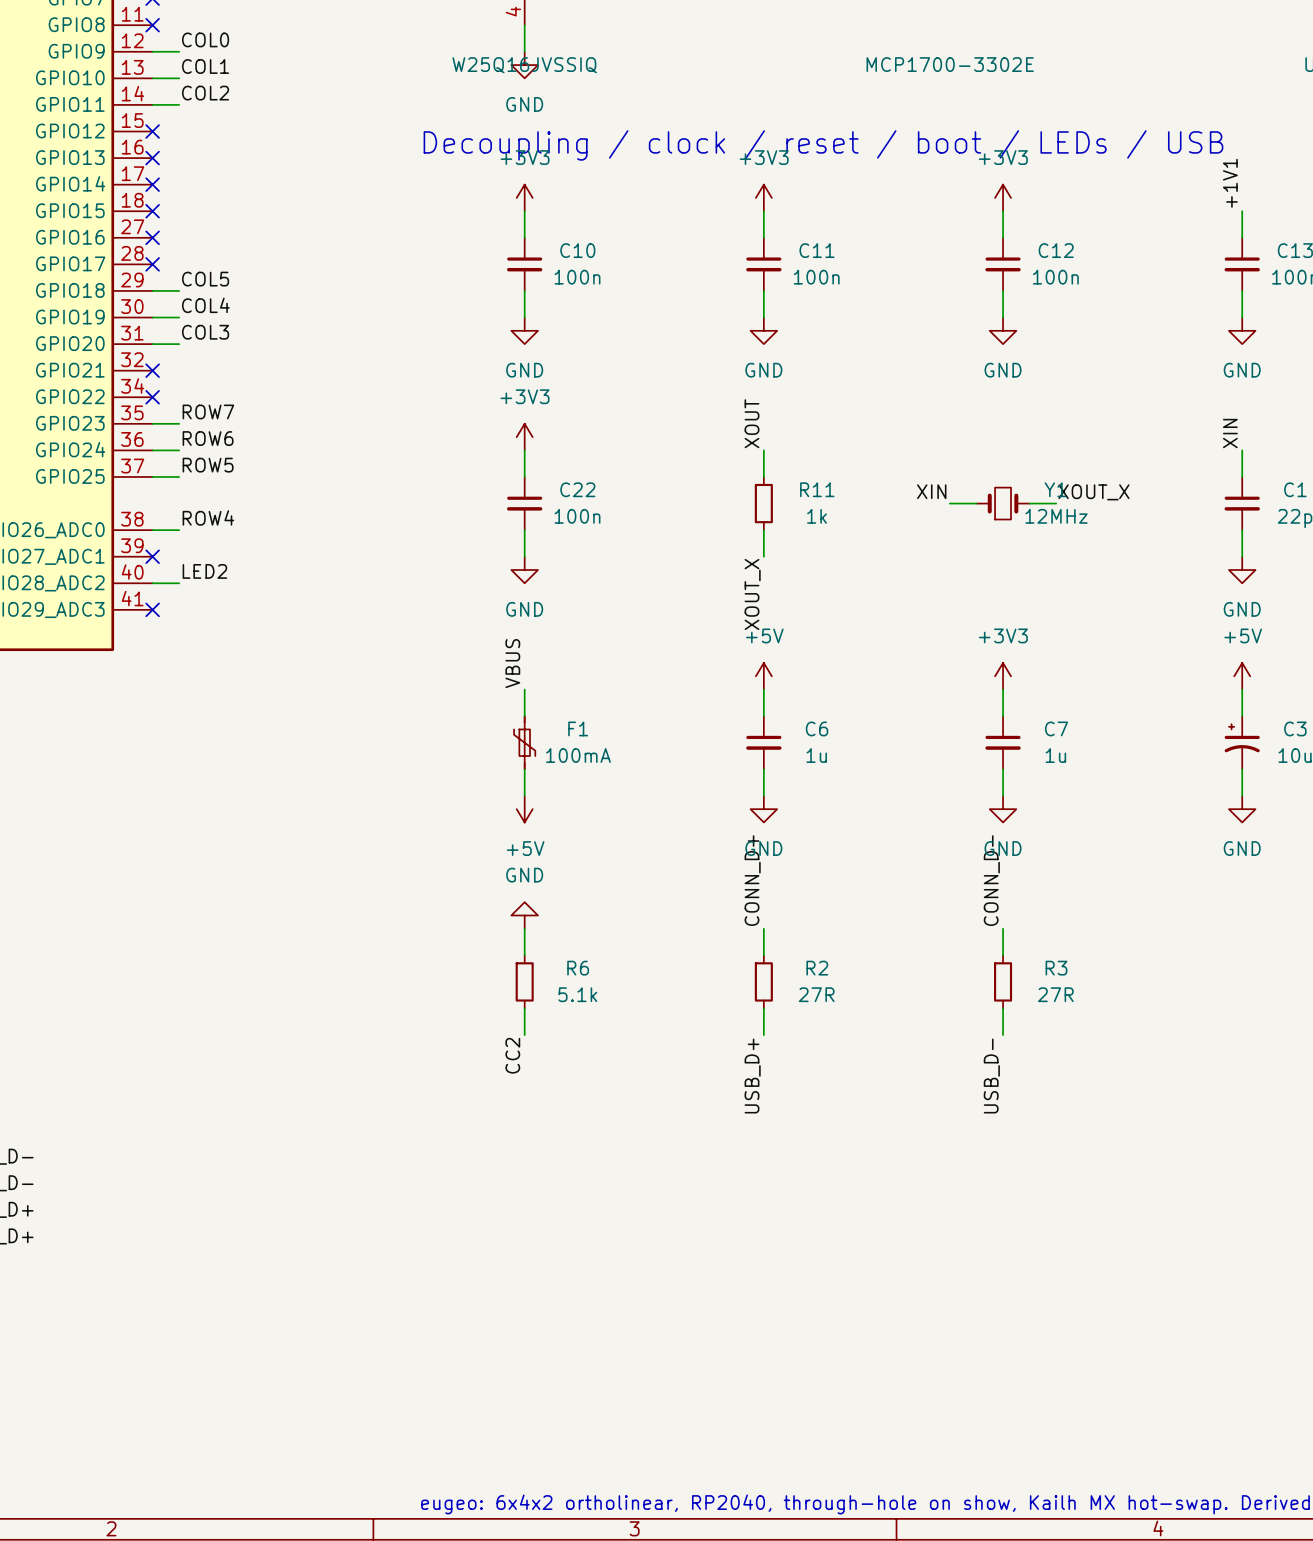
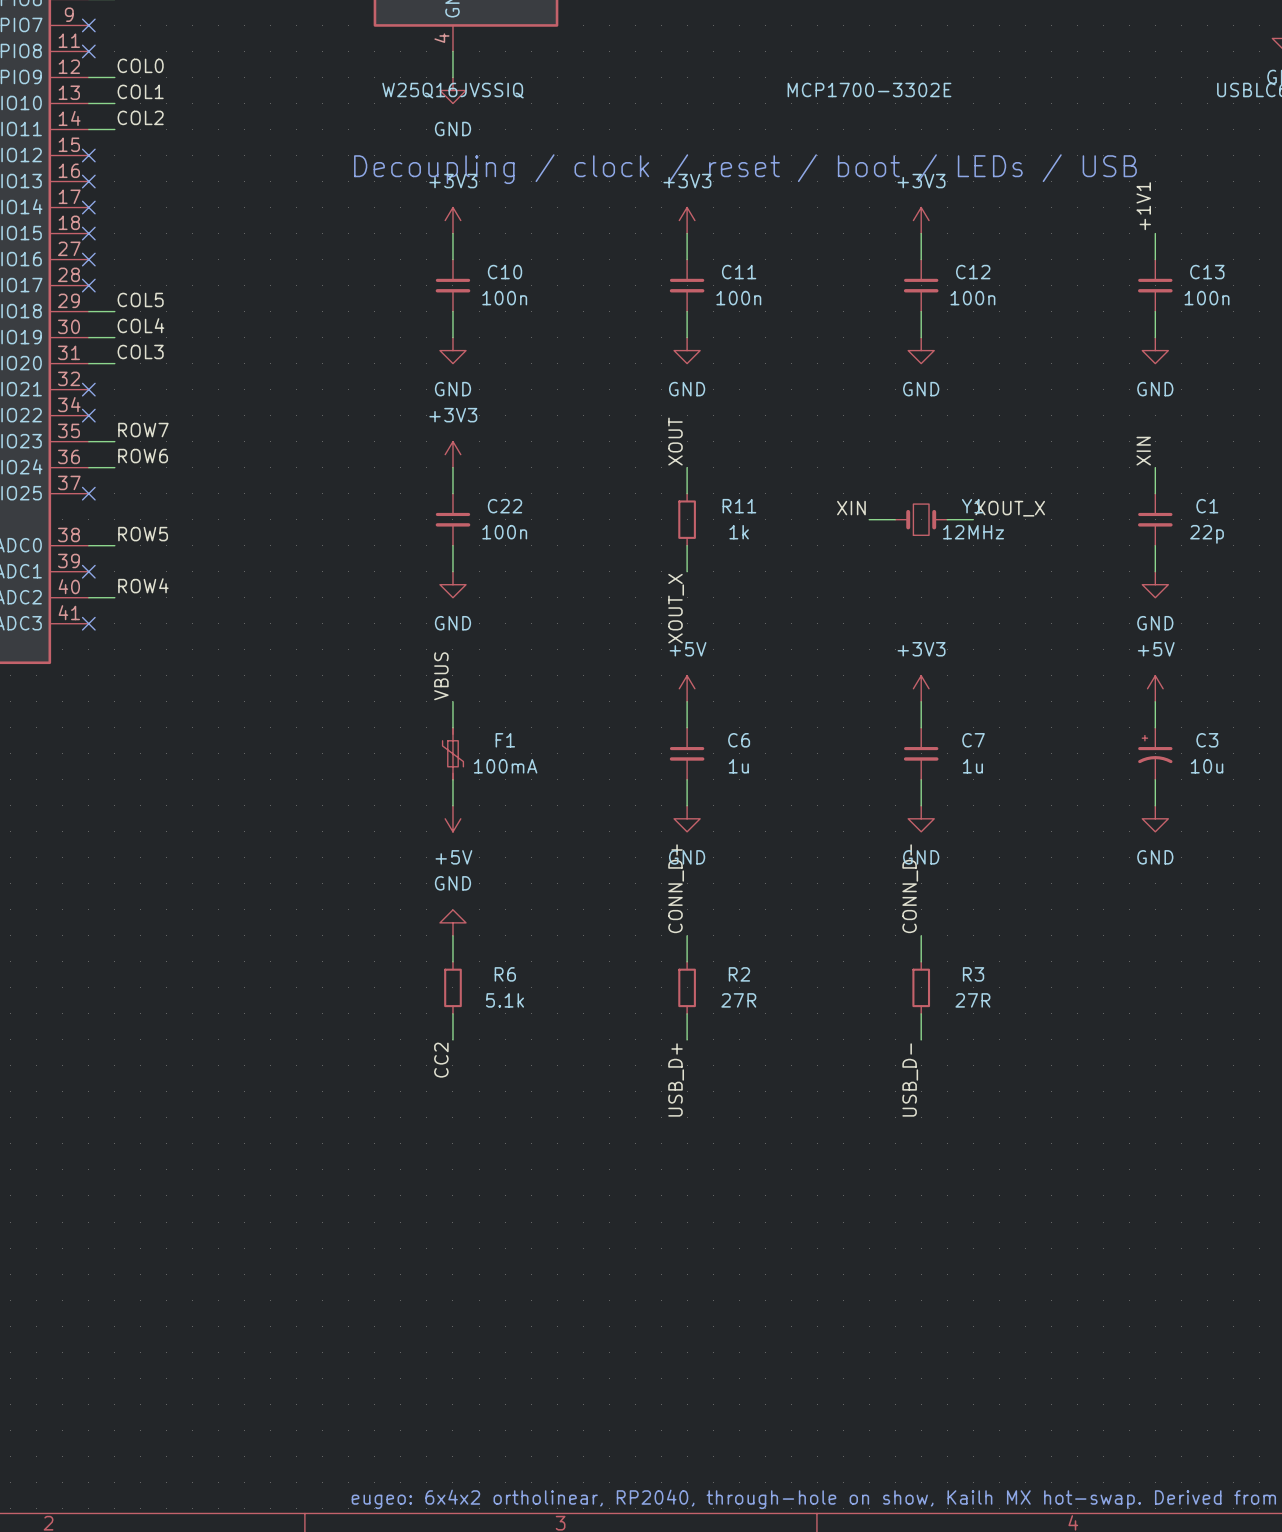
label: ROW5 (208, 465) -> none
wire: (152, 476) (179, 476) -> none
no-connect mark: none -> (88, 493)
label: ROW4 (208, 517) -> ROW5 (143, 534)
label: LED2 (204, 571) -> ROW4 (143, 585)

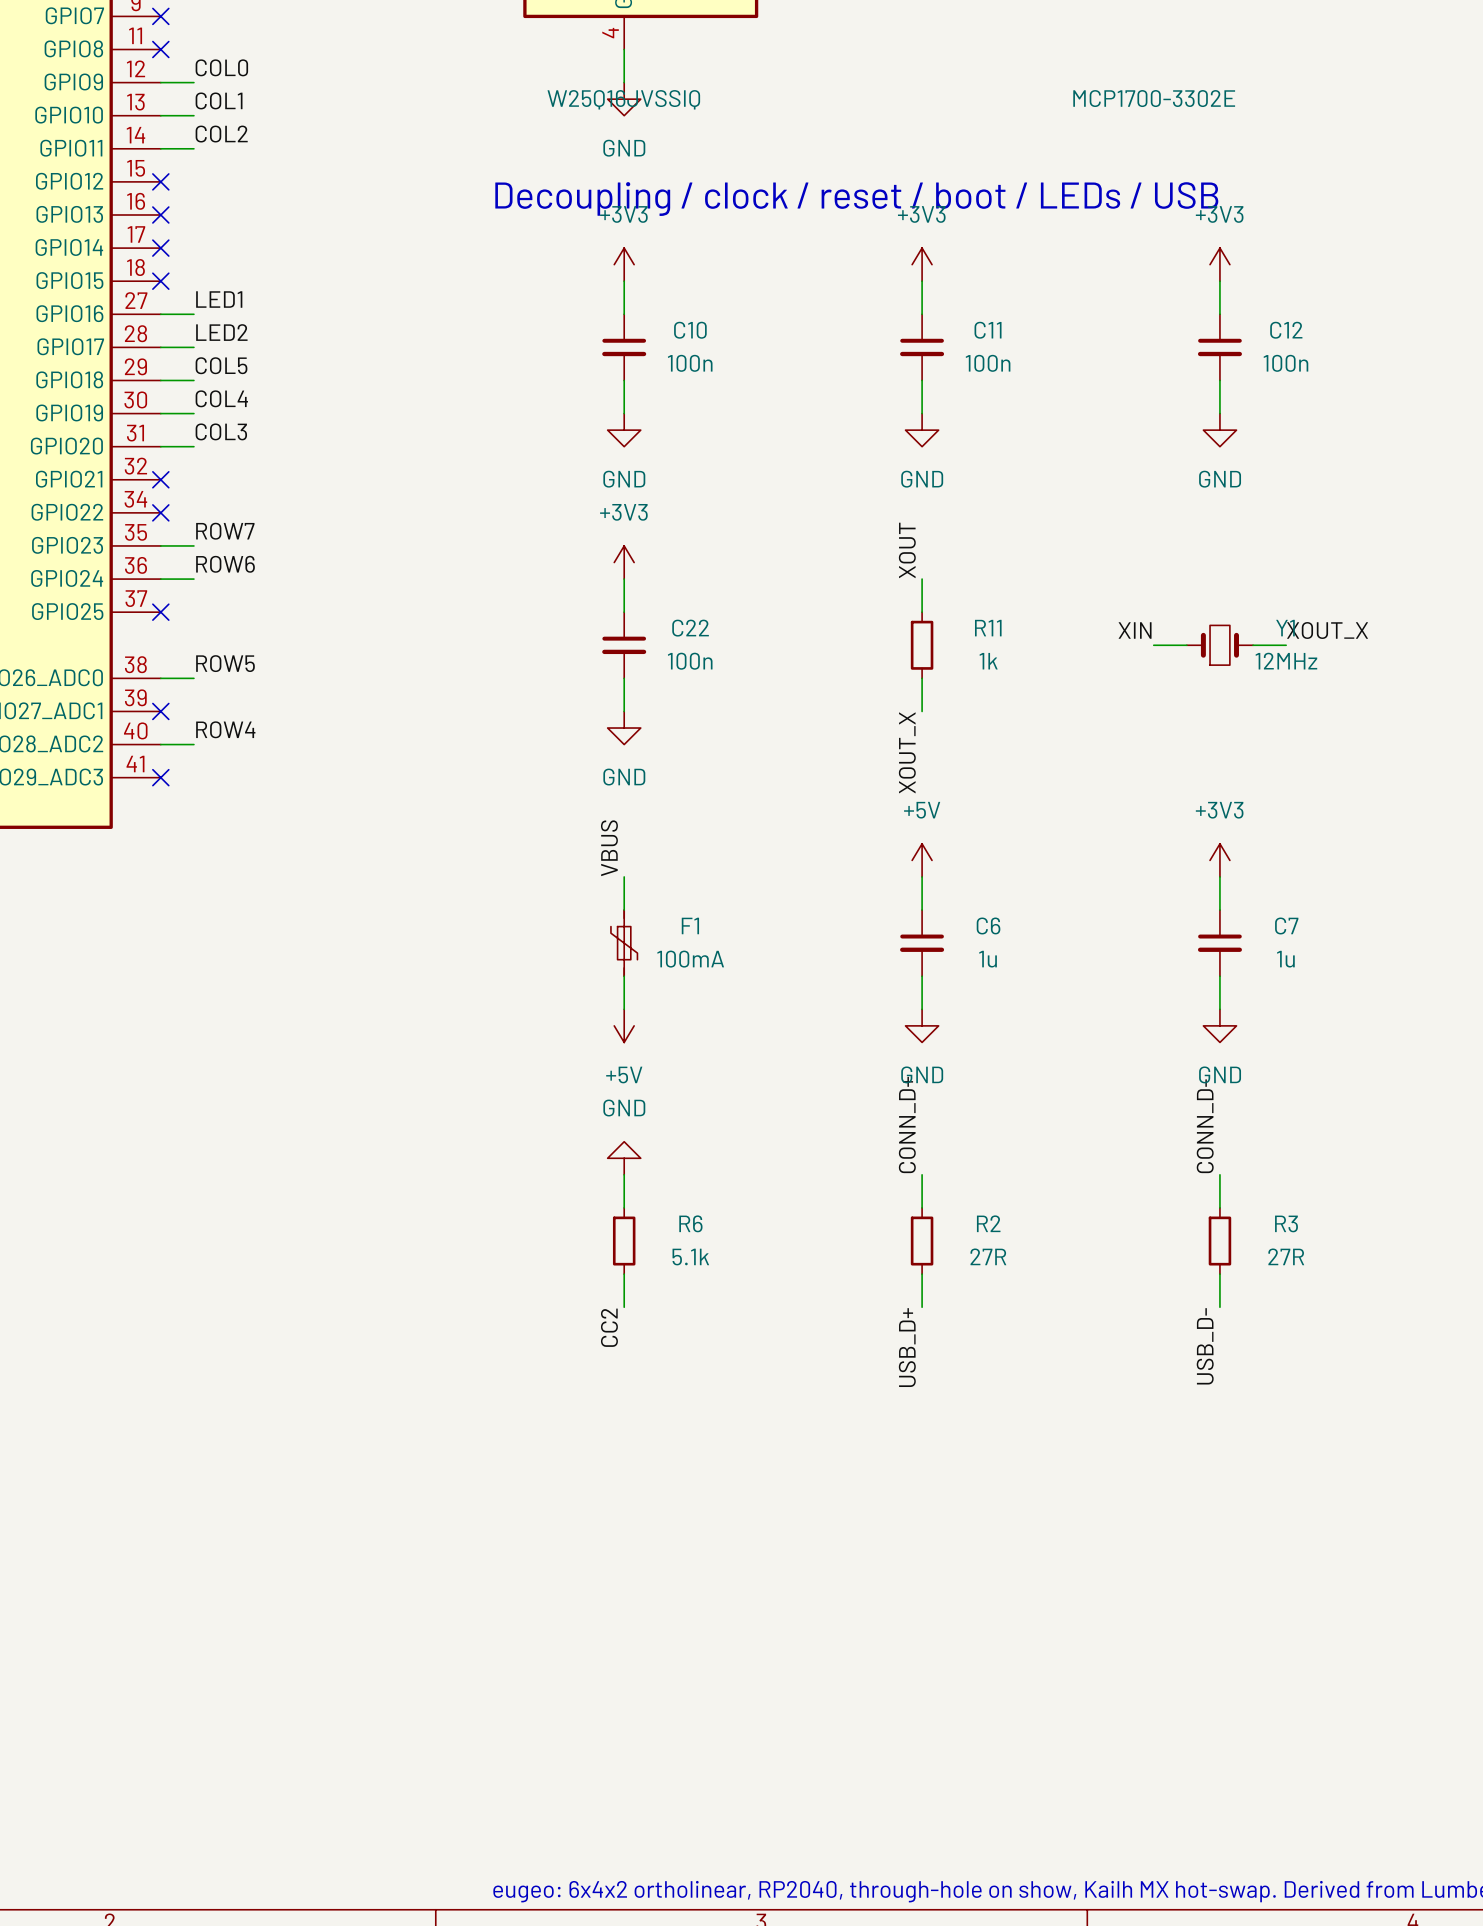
label: none -> LED1 (219, 299)
wire: none -> (160, 314) (193, 314)
no-connect mark: (88, 259) -> none
label: none -> LED2 (221, 332)
wire: none -> (160, 347) (193, 347)
no-connect mark: (88, 285) -> none

